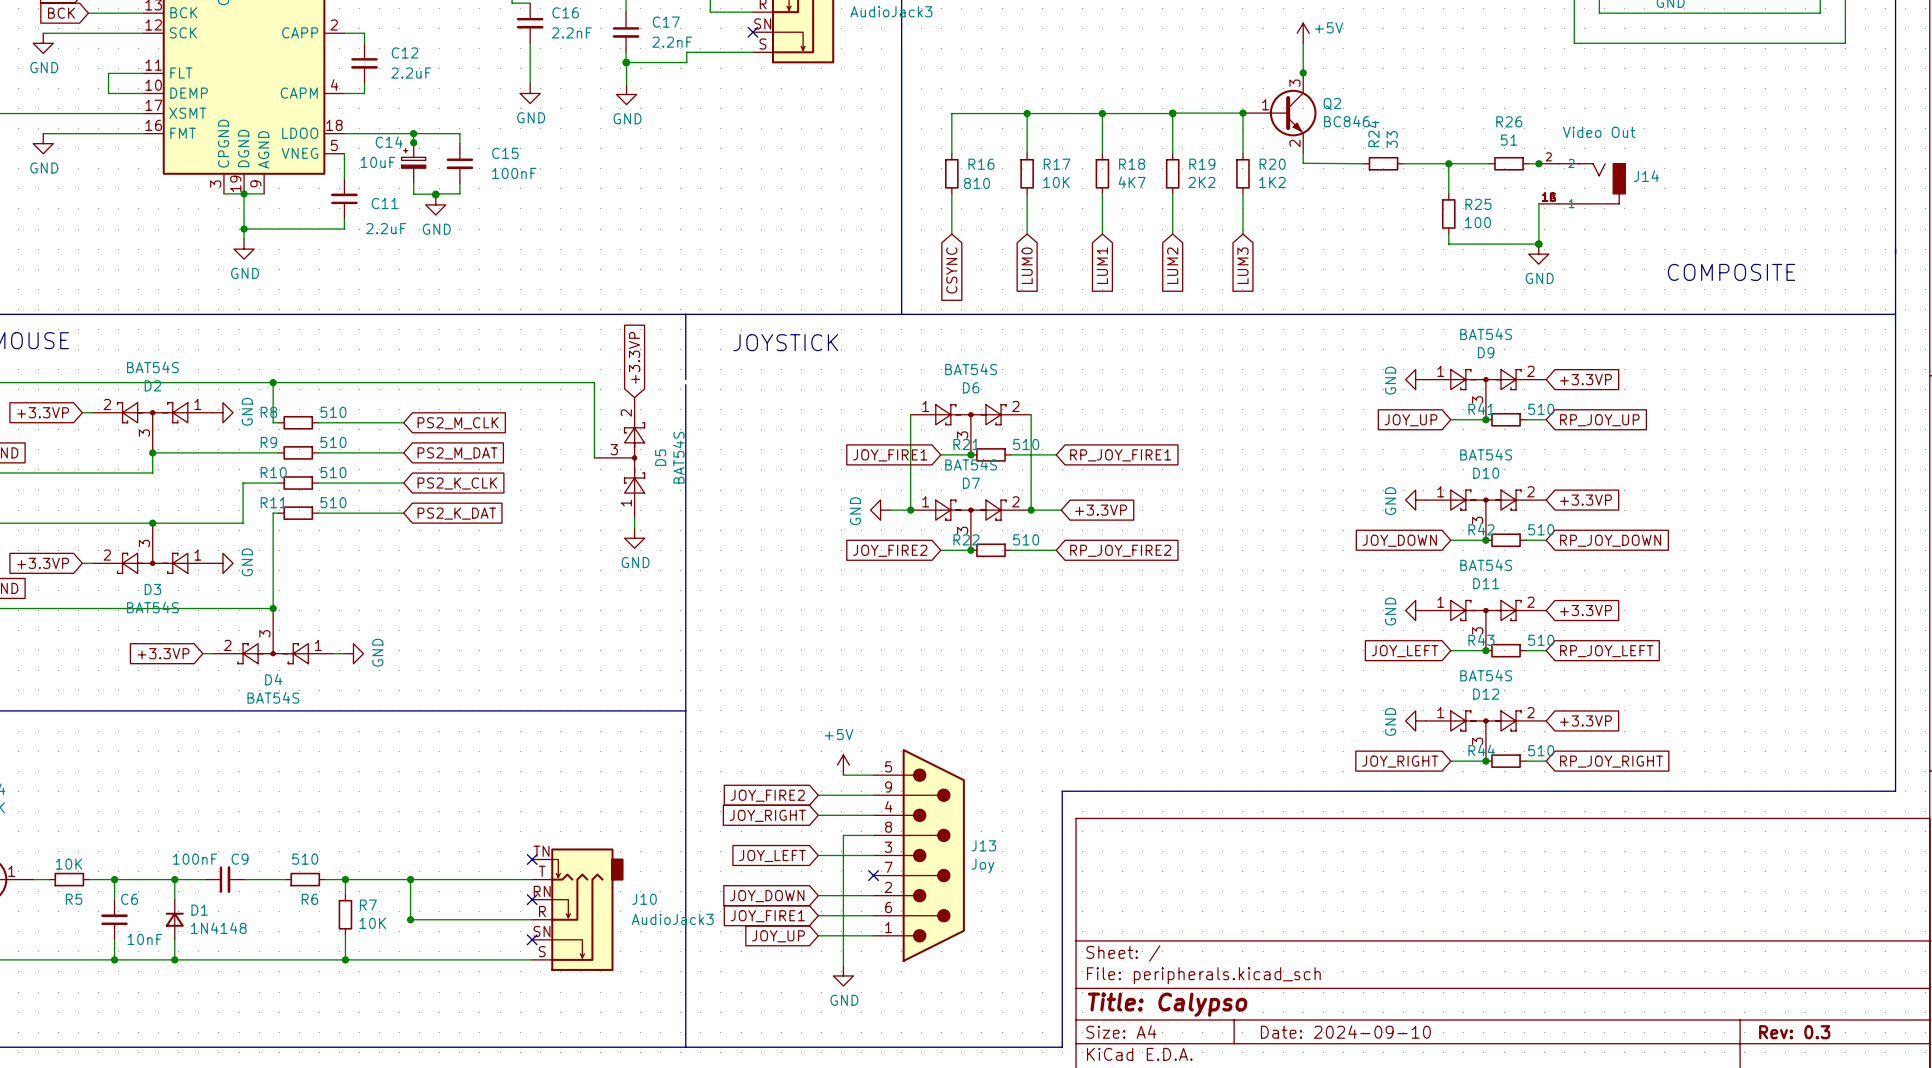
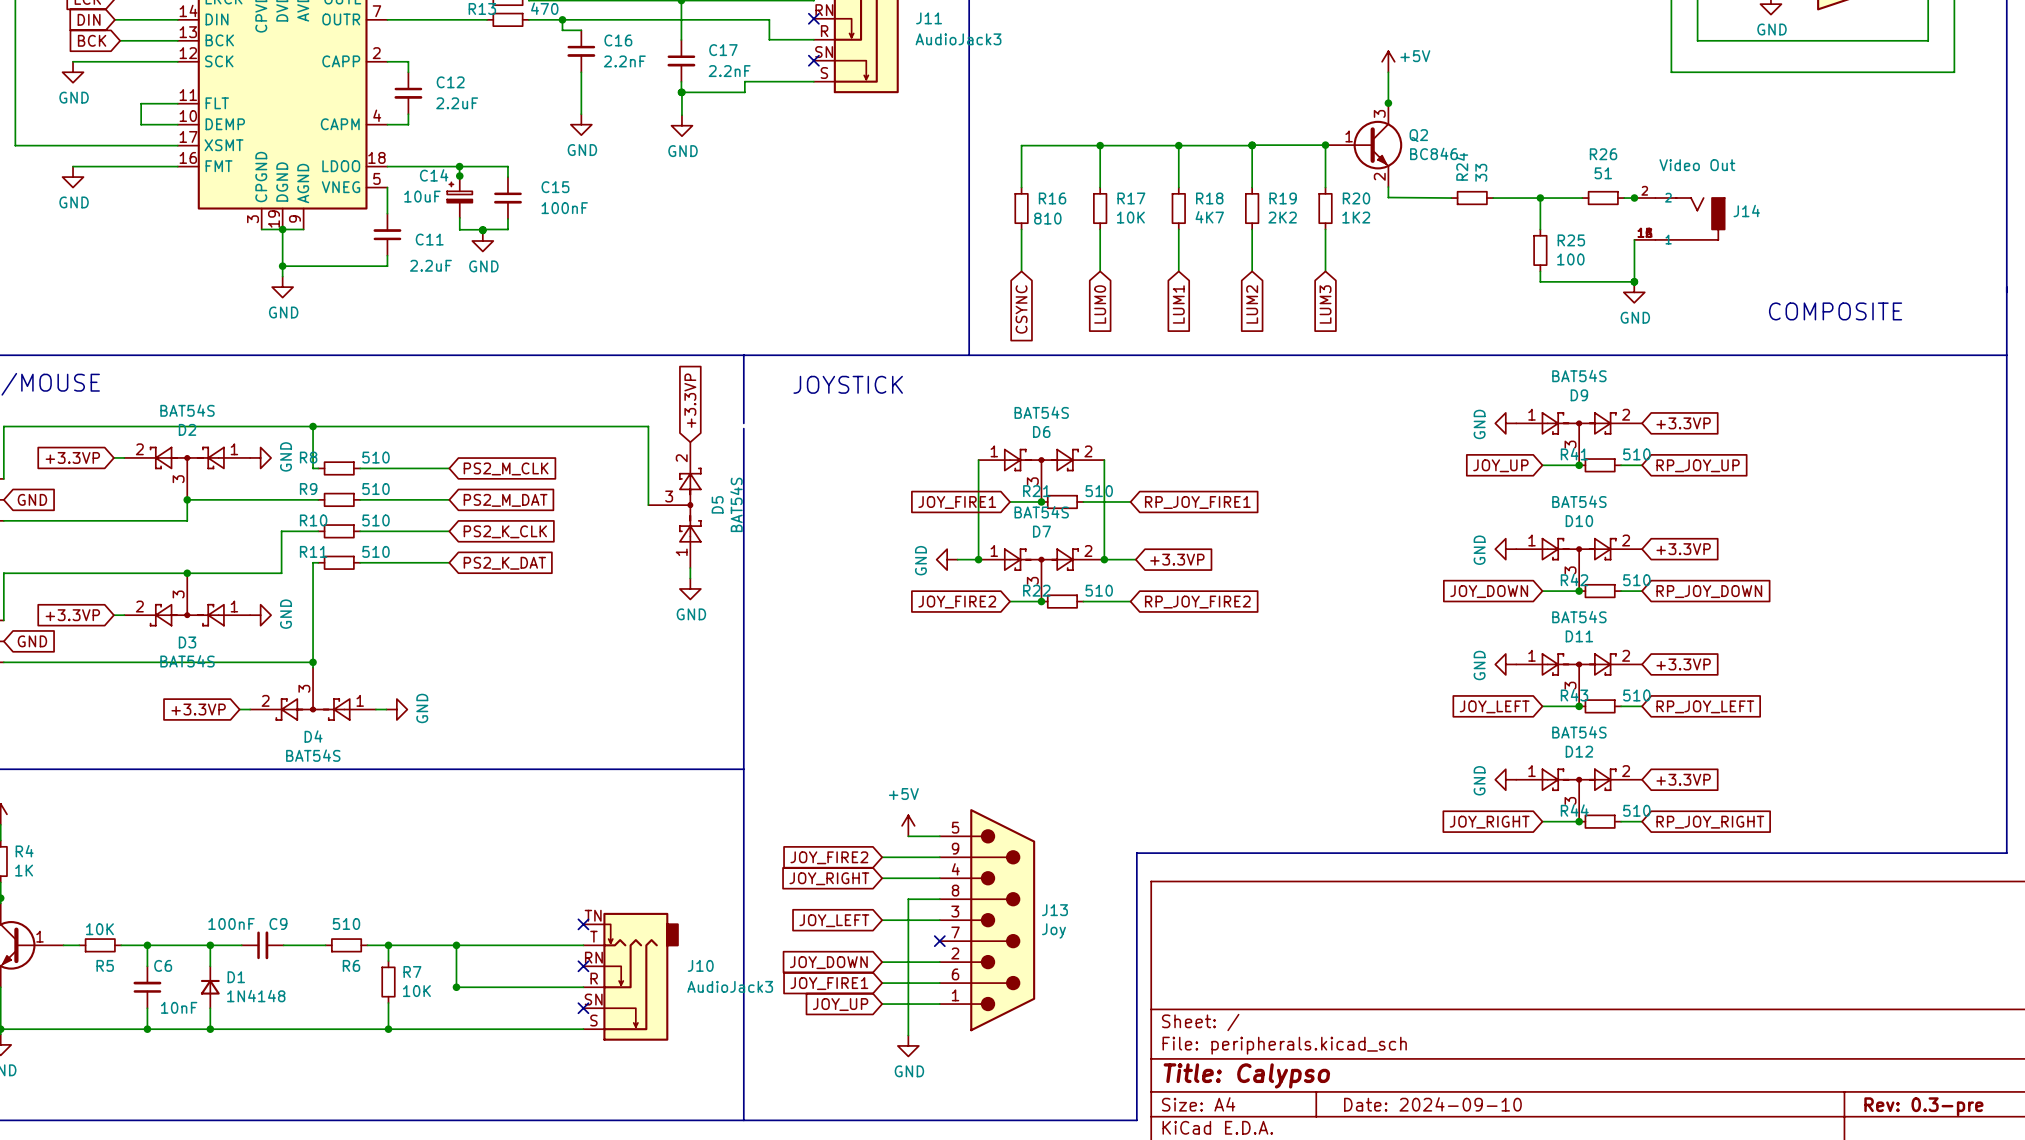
title block: Rev: 0.3 (1794, 1032) -> Rev: 0.3-pre (1923, 1106)

